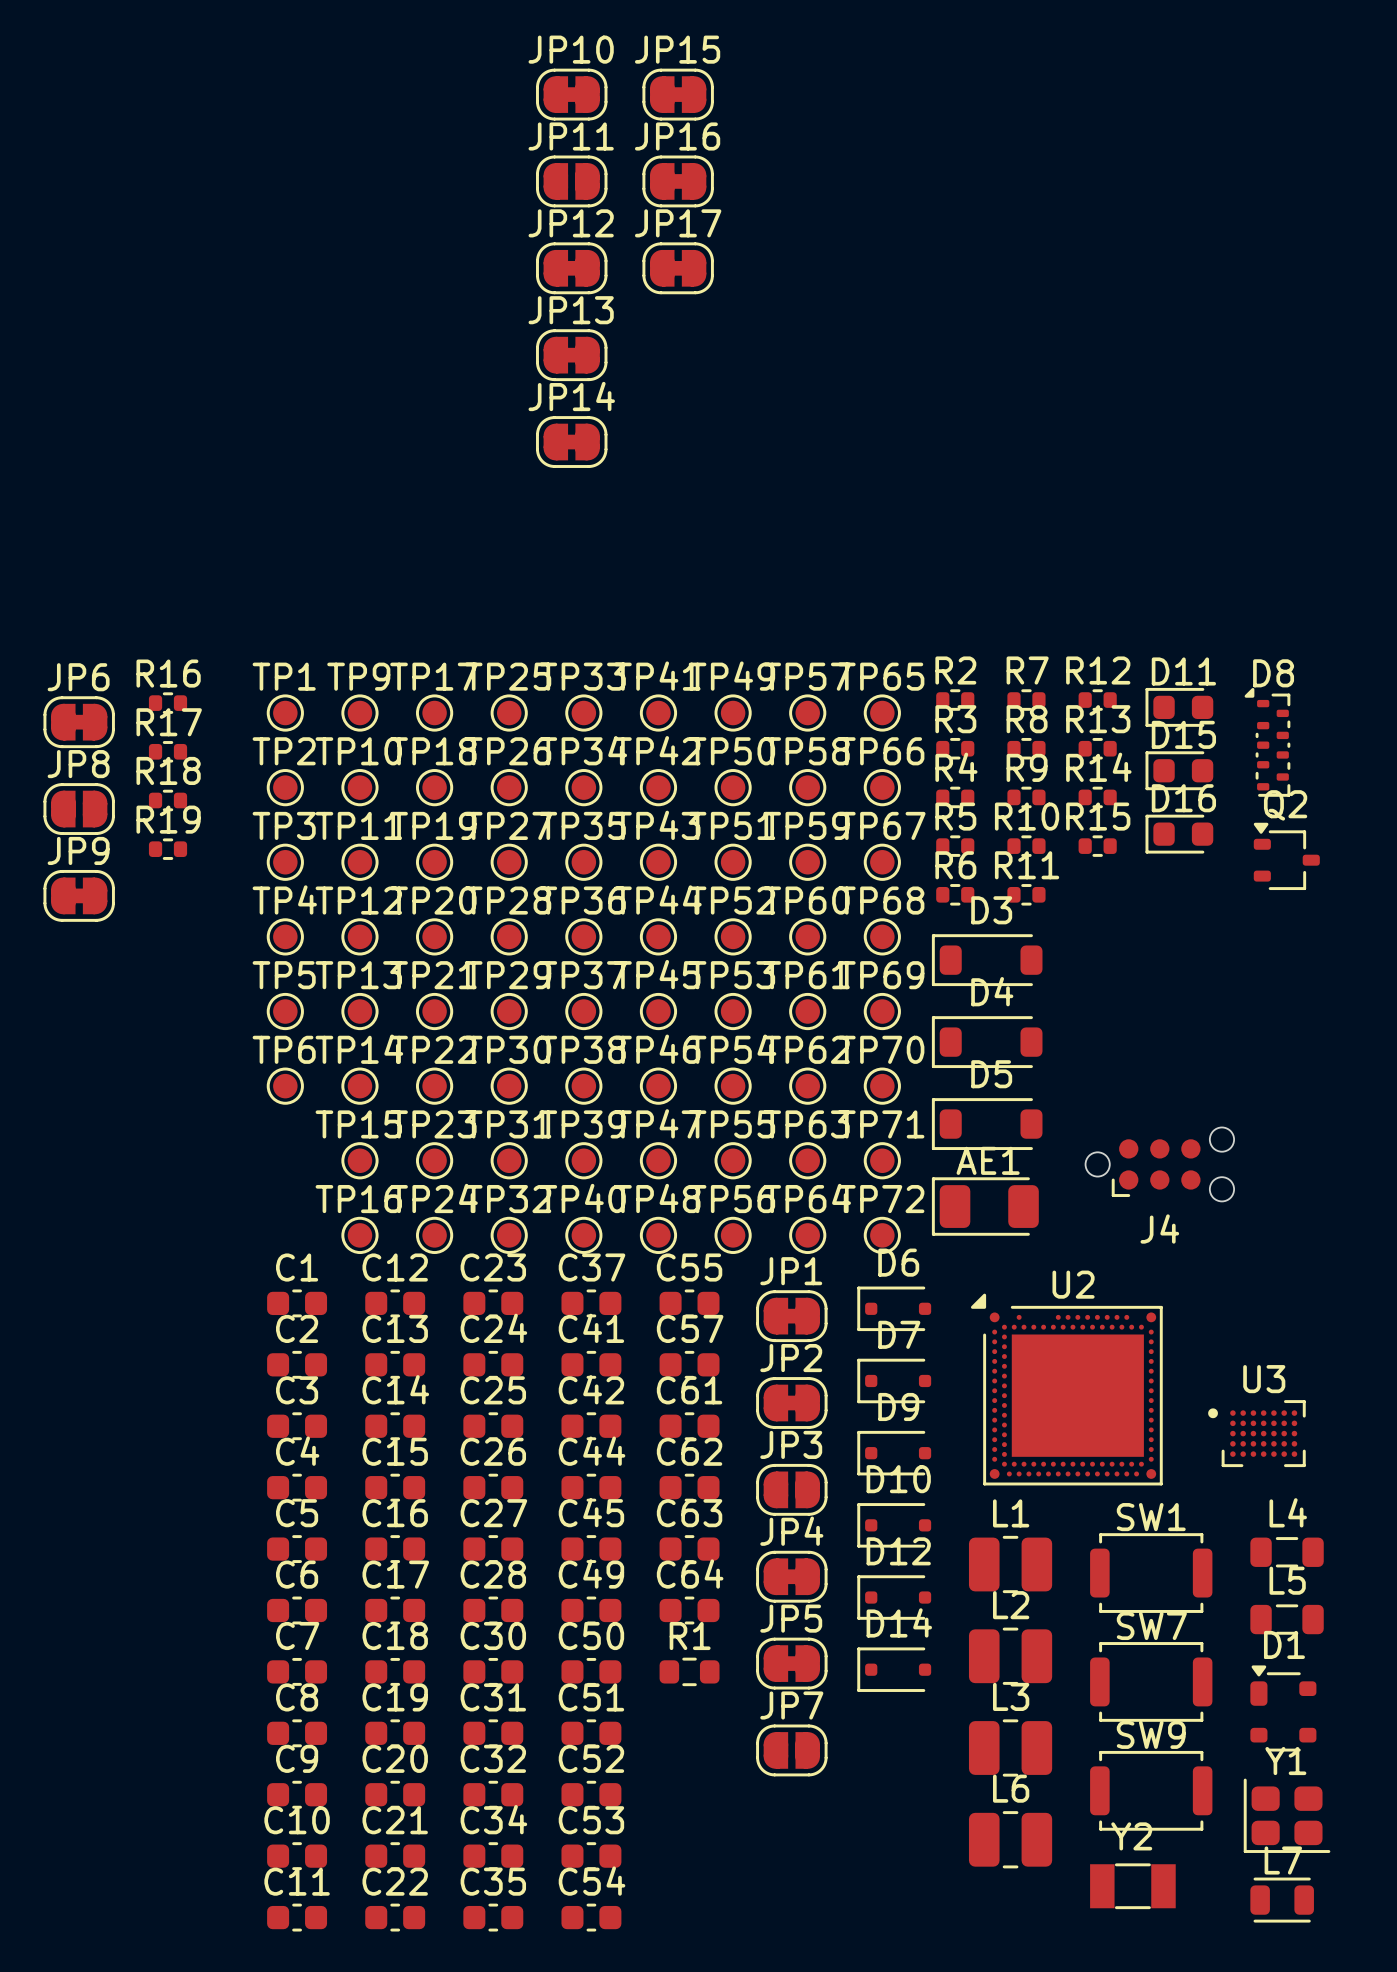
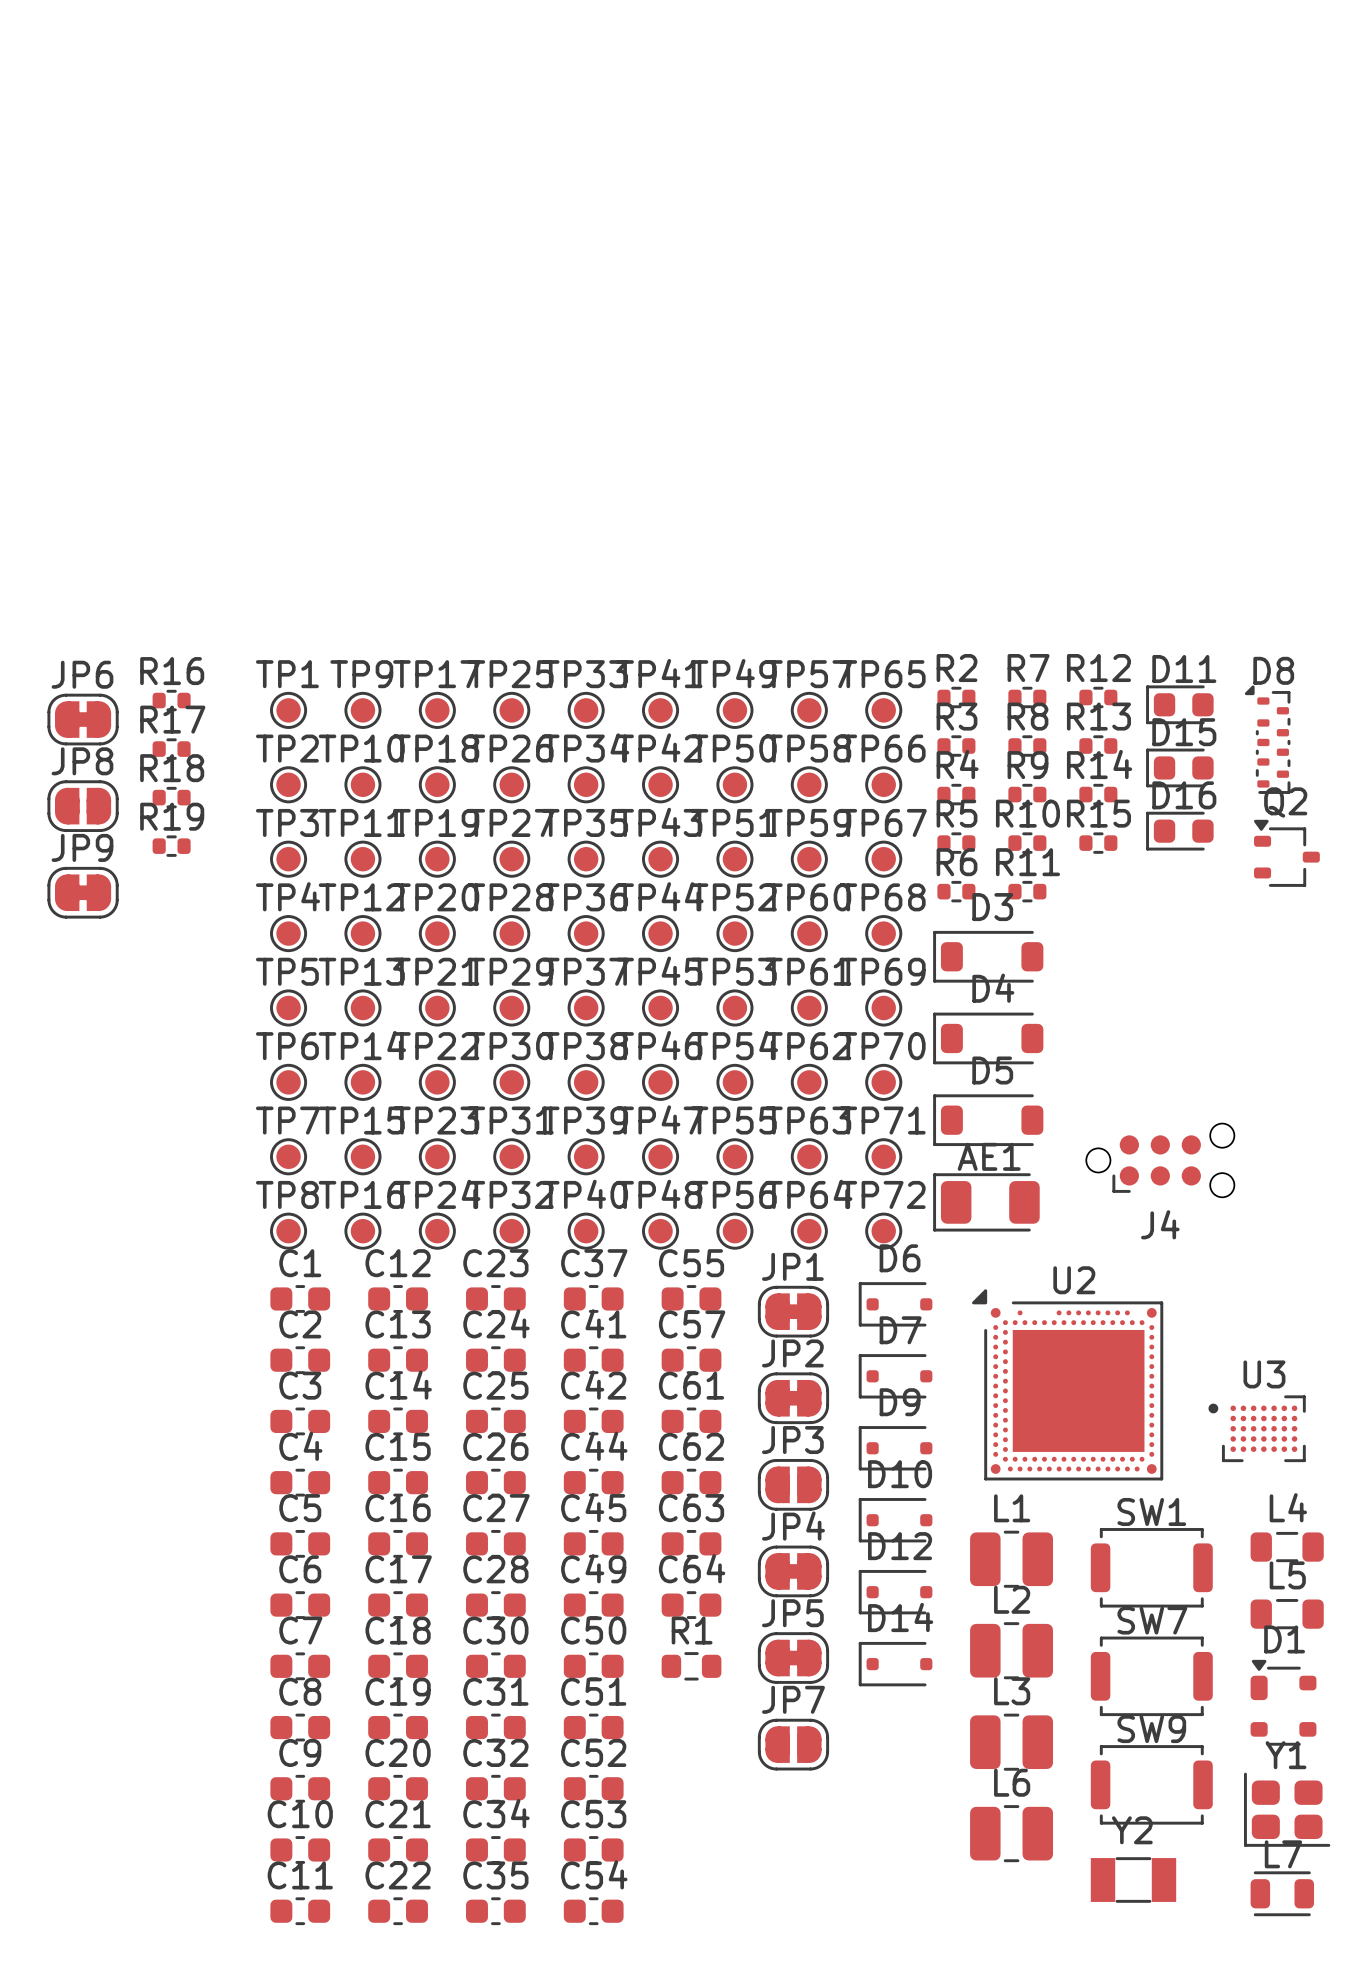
JP10: (571, 94) -> none
JP15: (678, 94) -> none
JP11: (571, 181) -> none
JP16: (678, 181) -> none
JP12: (571, 268) -> none
JP17: (678, 268) -> none
JP13: (571, 355) -> none
JP14: (571, 442) -> none
TP7: none -> (288, 1156)
TP8: none -> (288, 1231)

